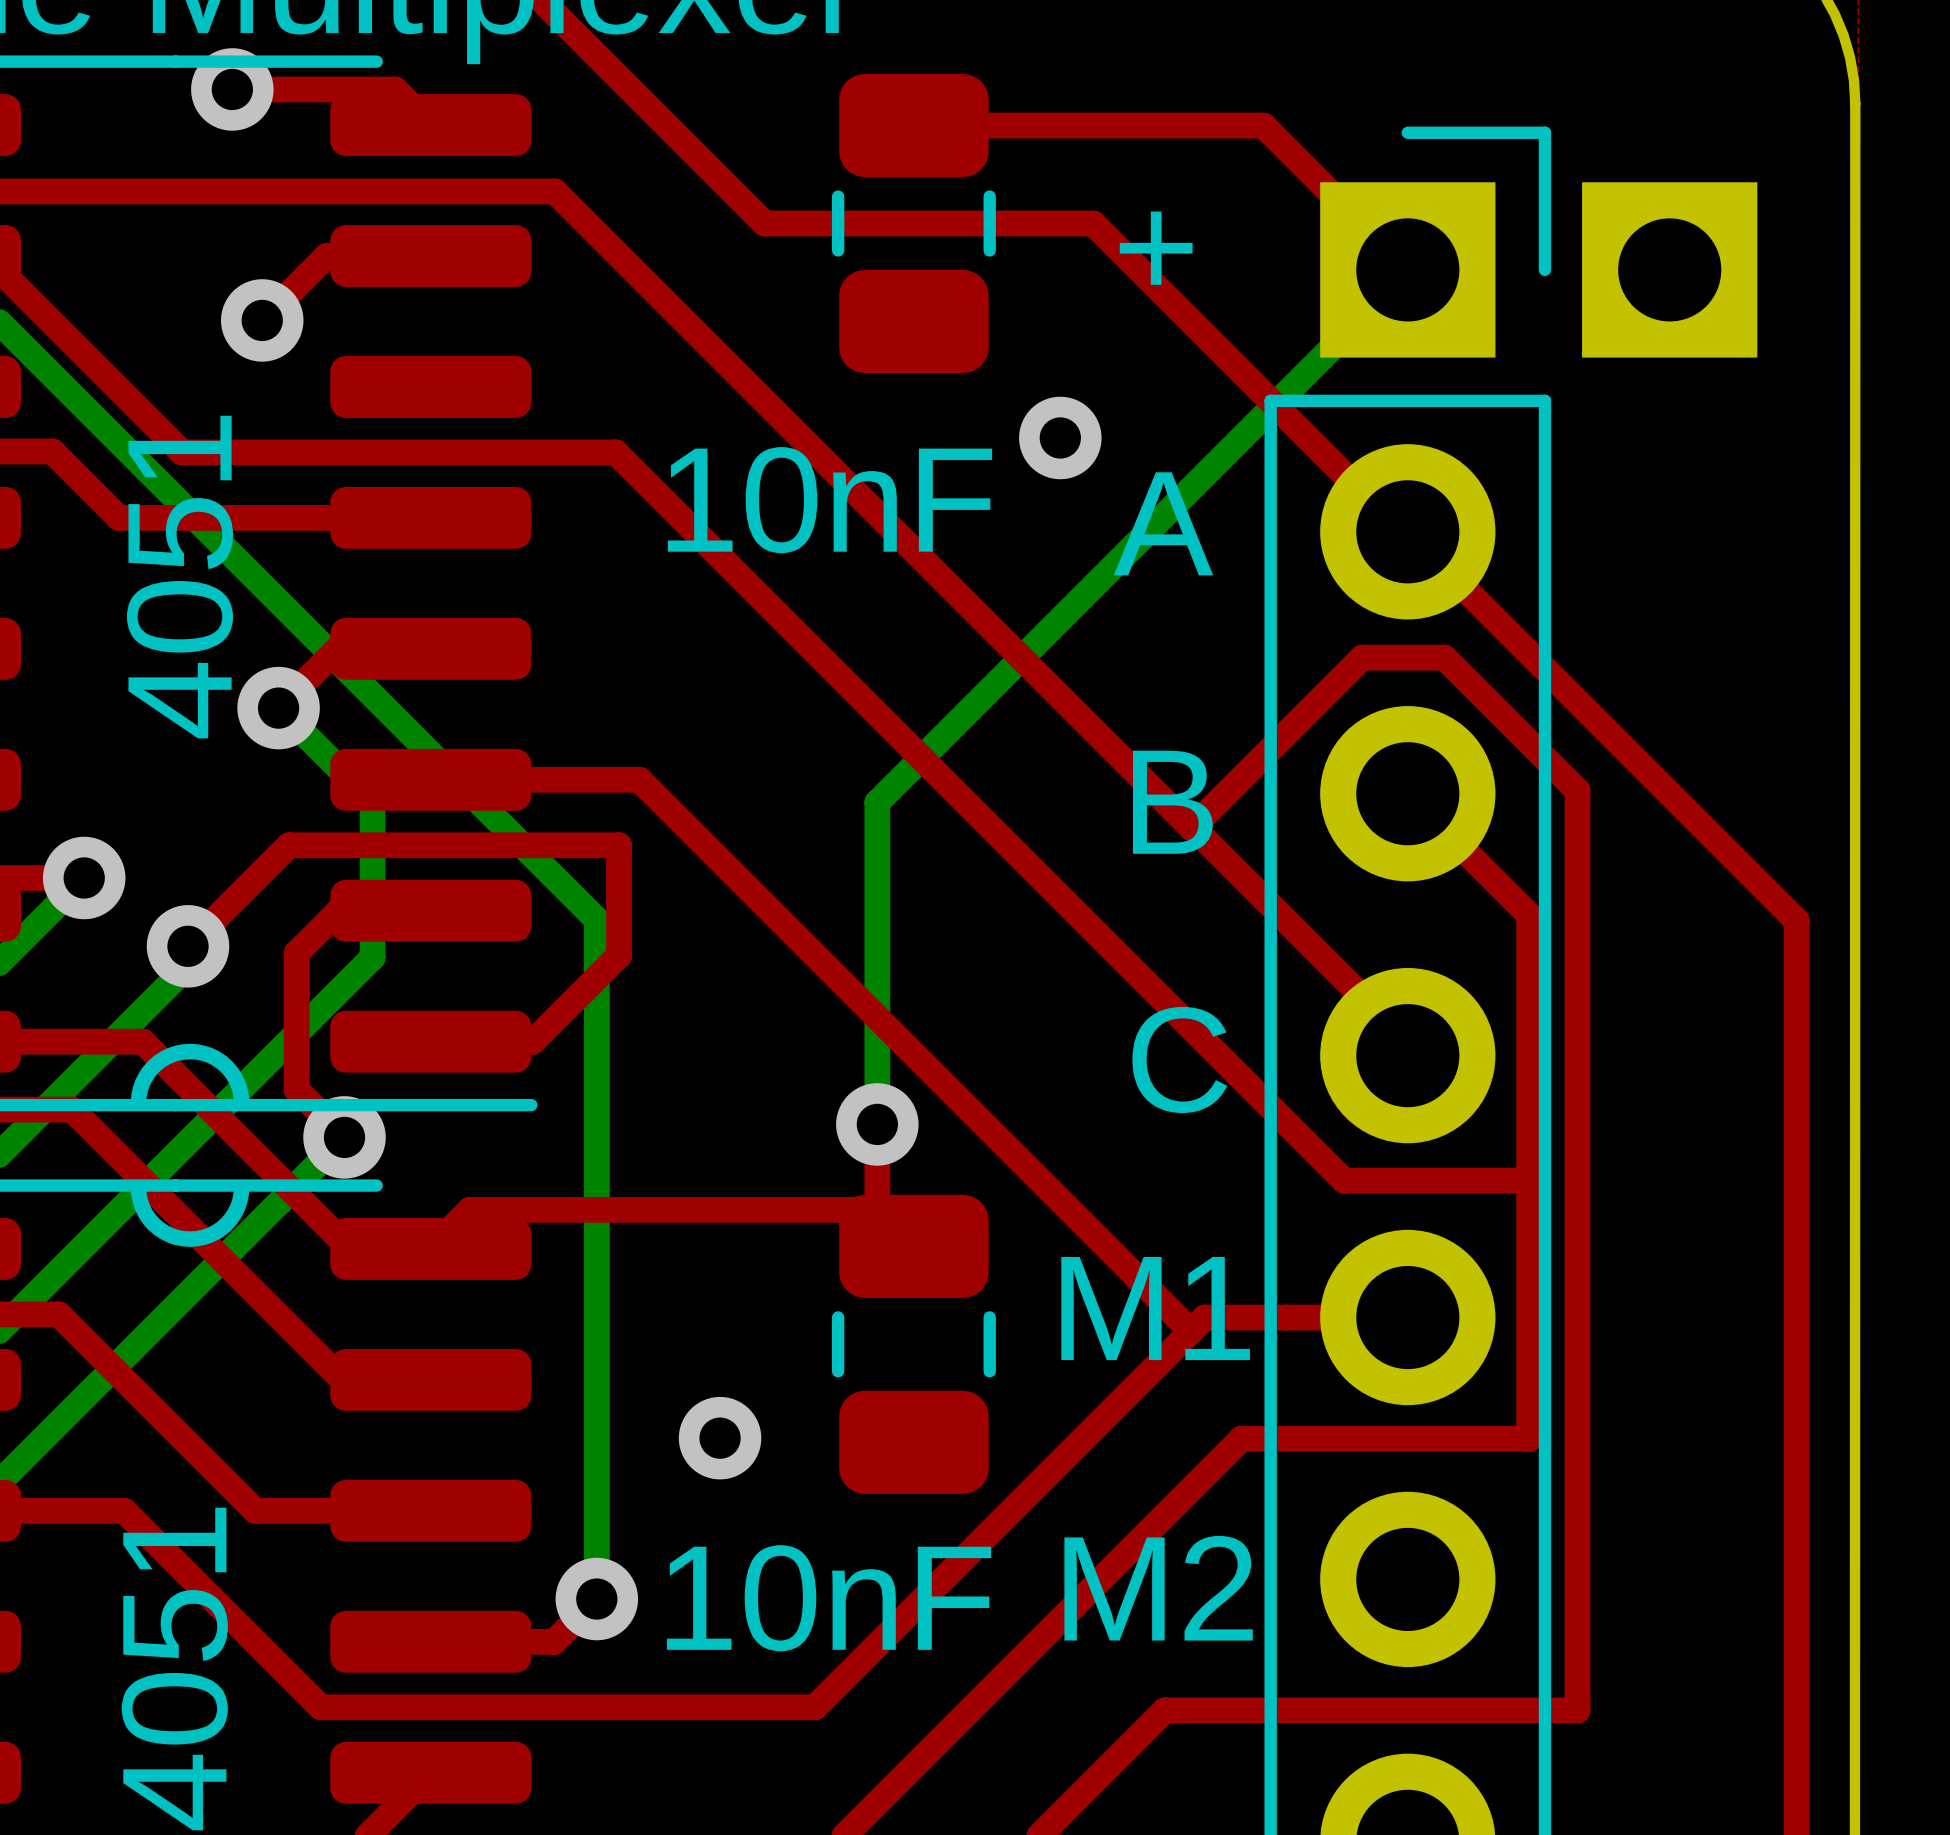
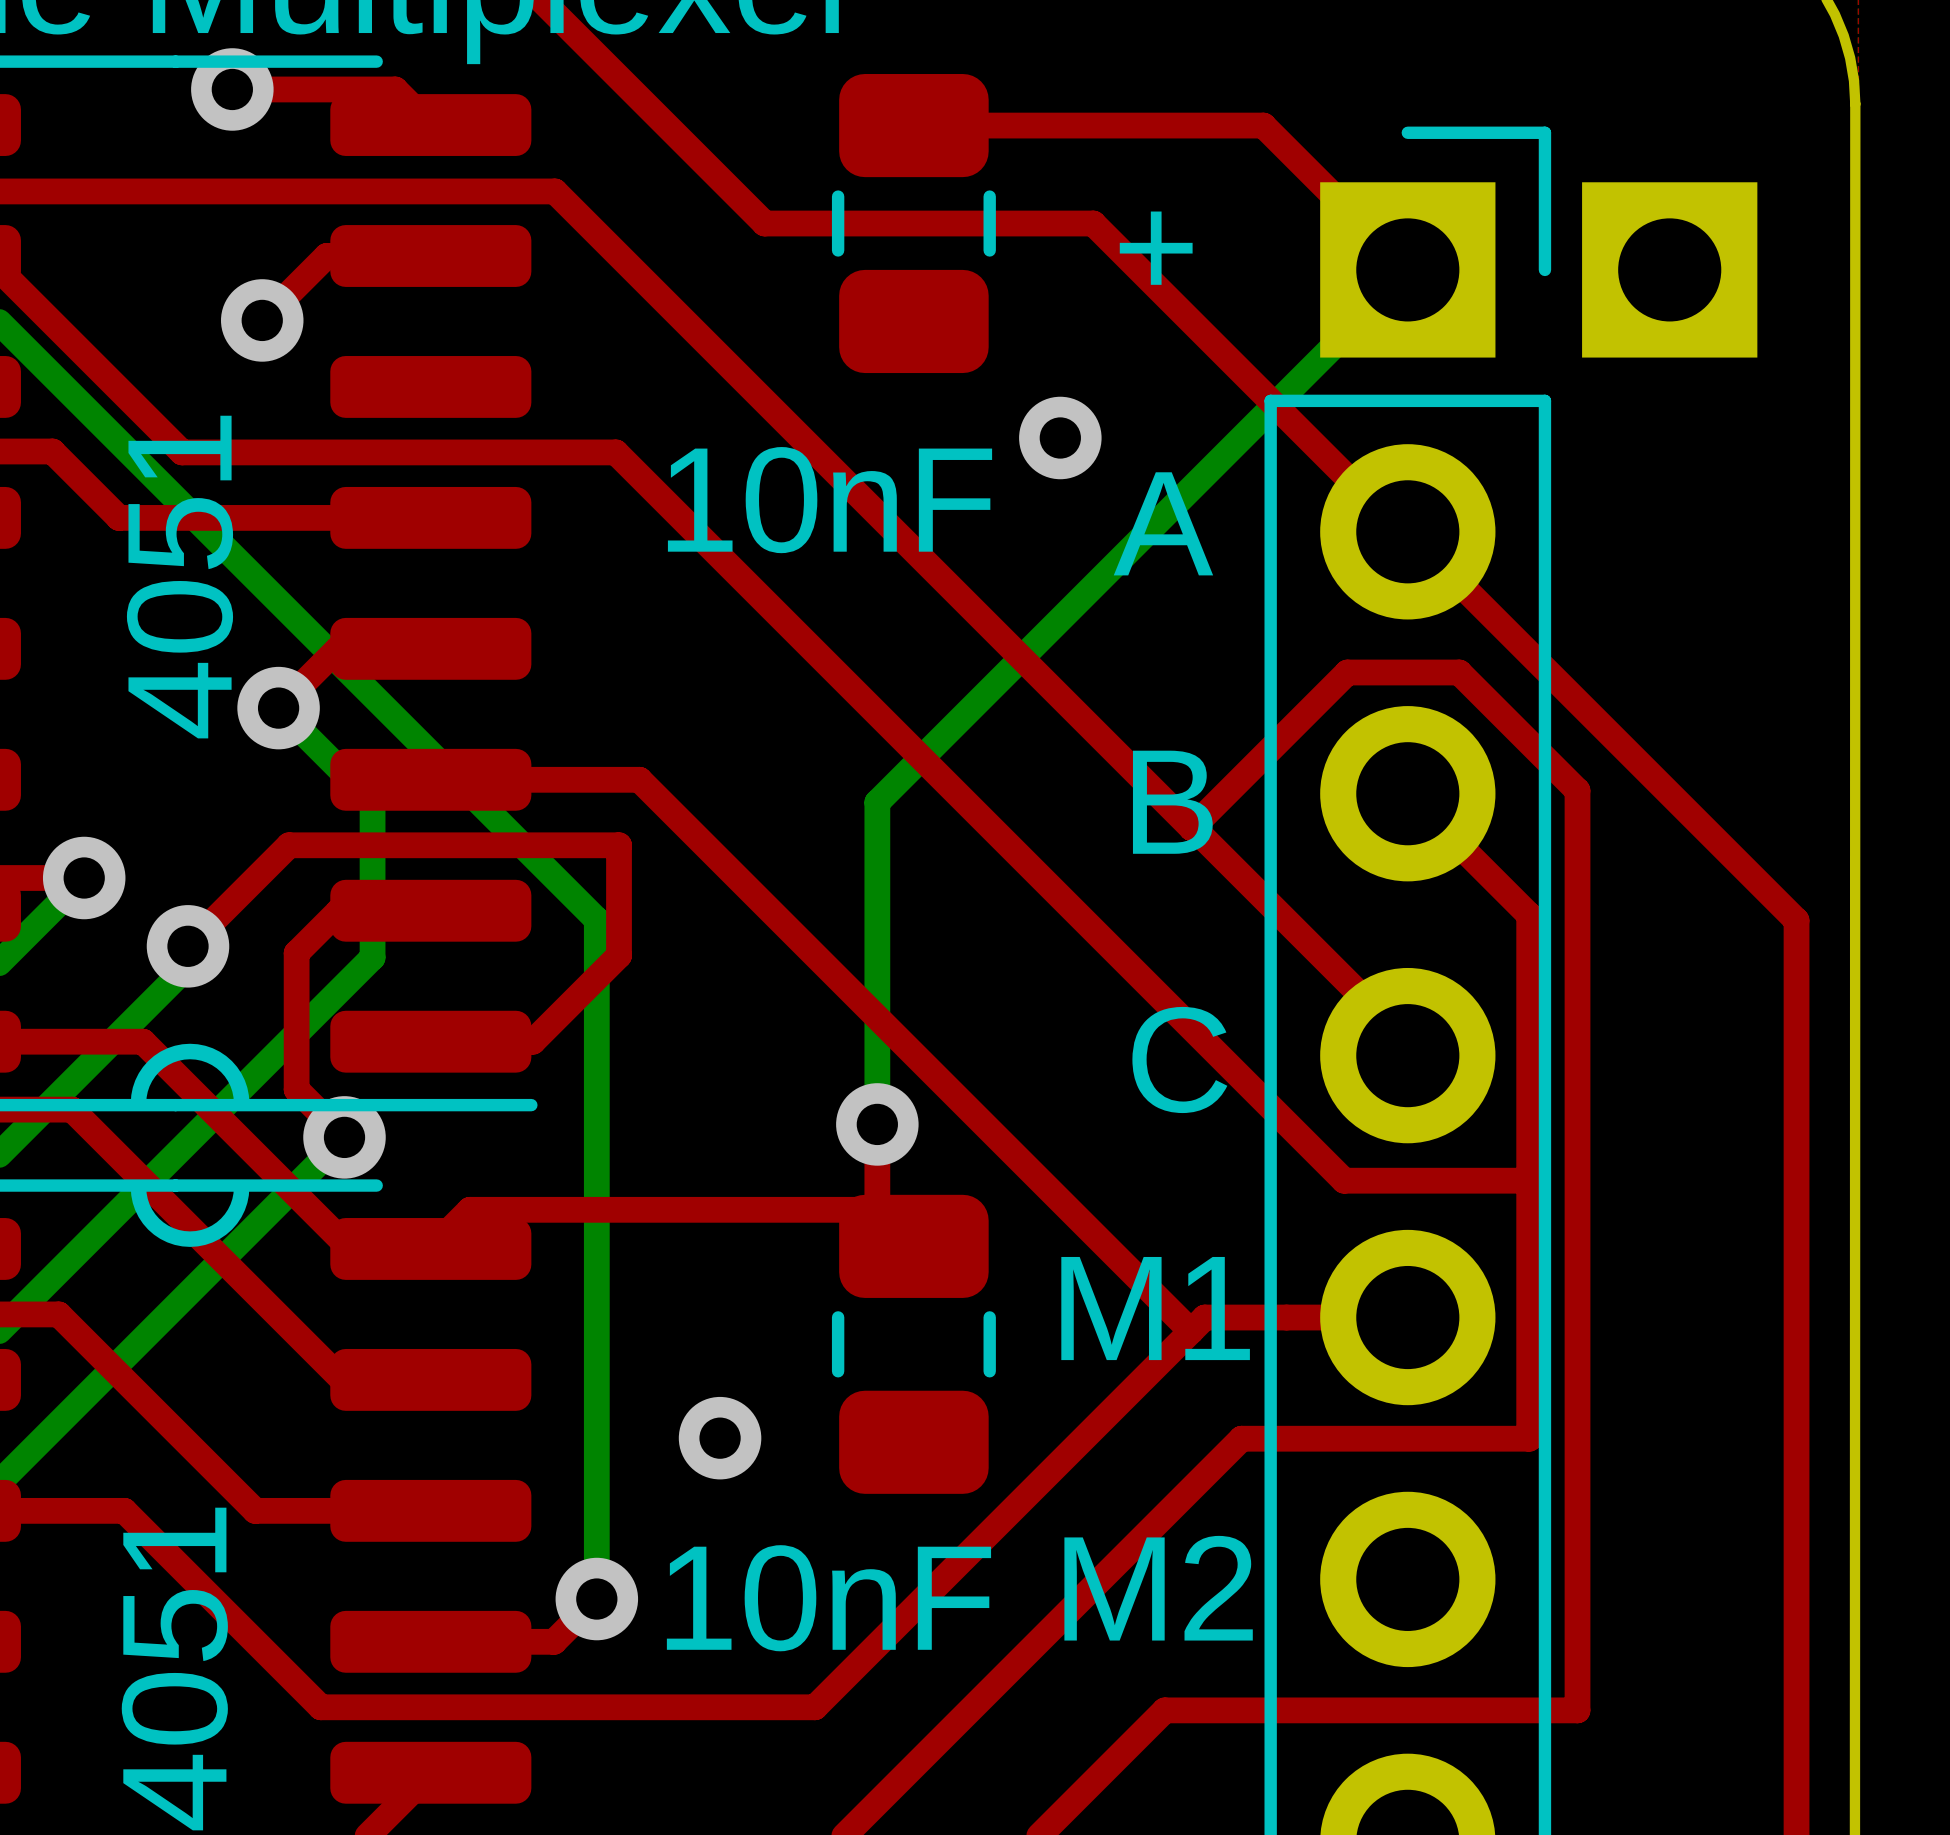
top track: (1347, 672) (1362, 657) (1444, 657) (1459, 672) -> (1347, 672) (1459, 672)

